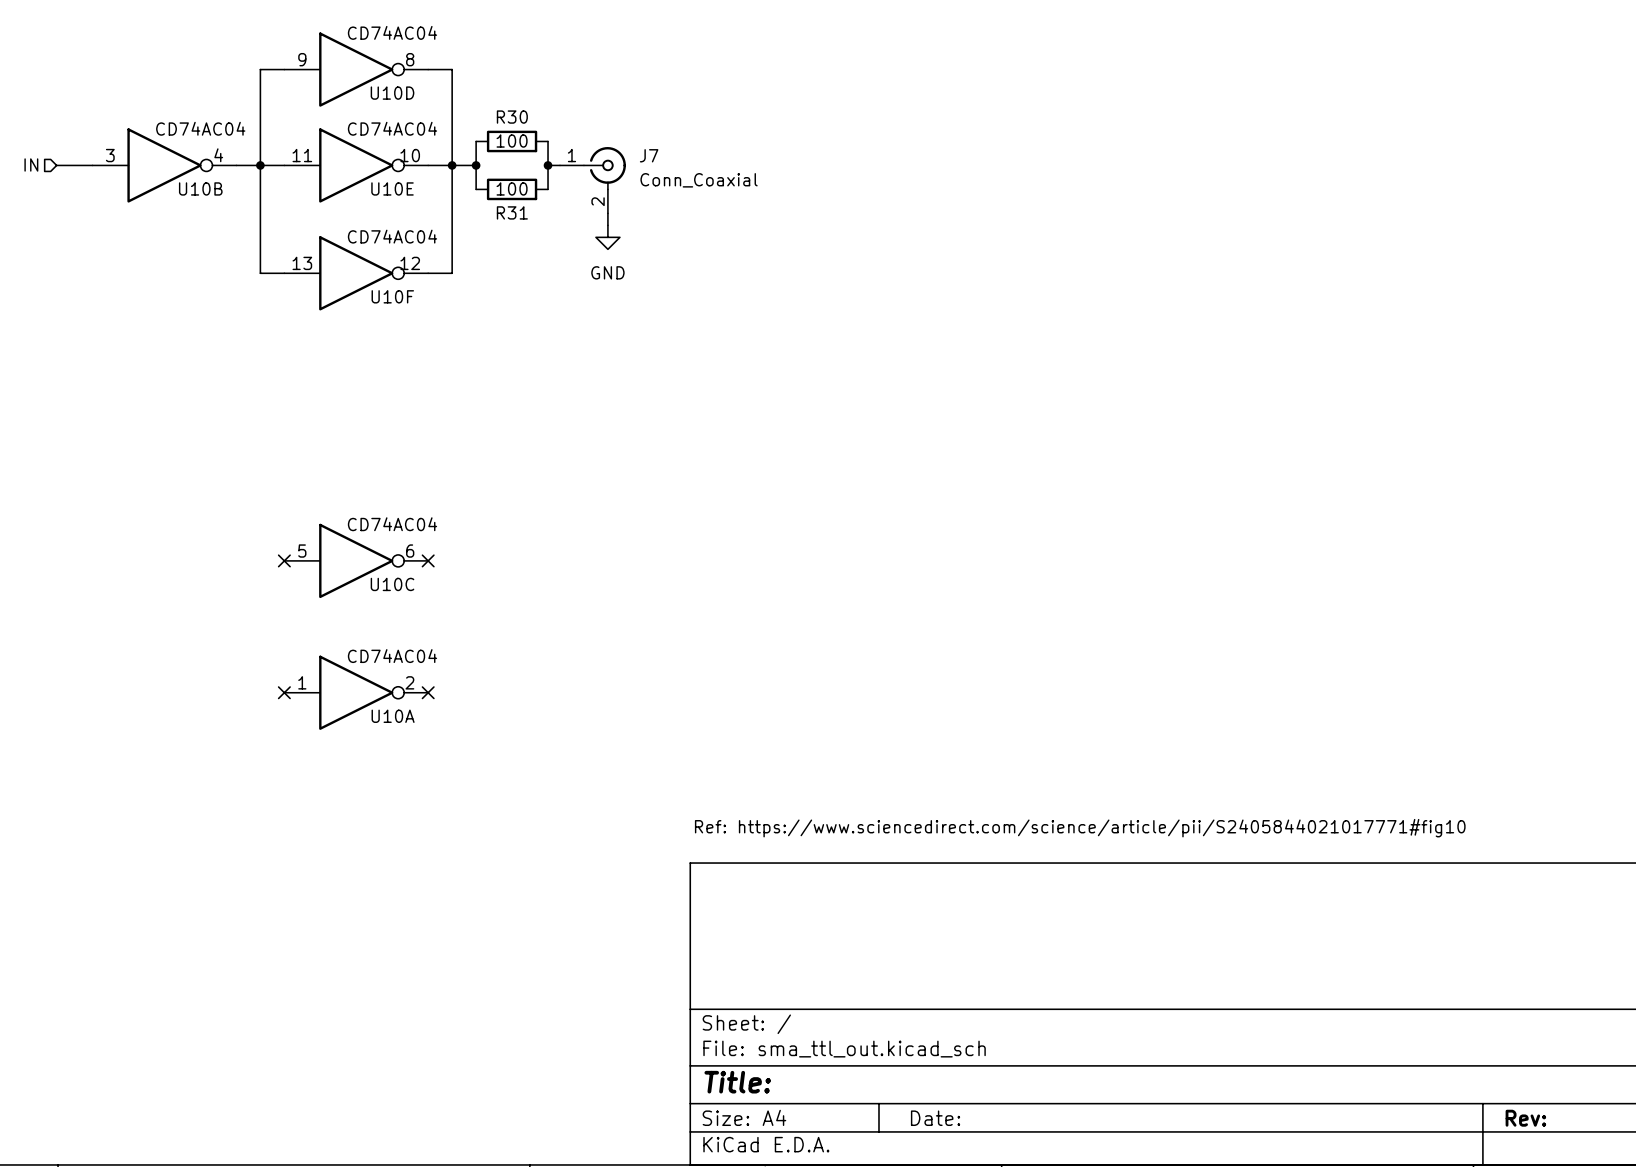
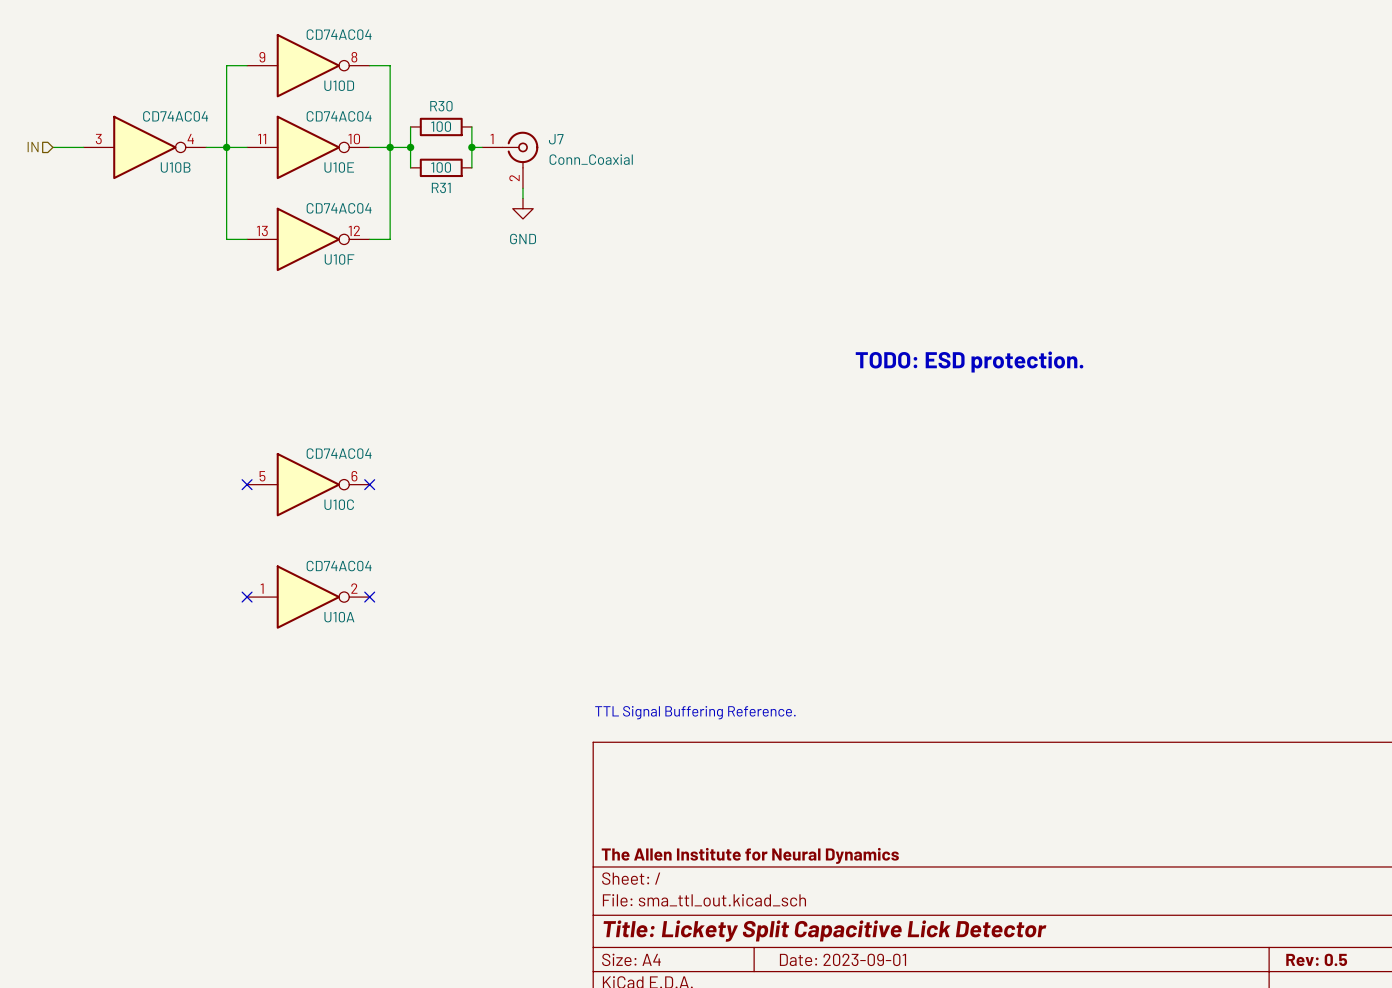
text: none -> TODO: ESD protection. (969, 362)
text: Ref: https://www.sciencedirect.com/science/article/pii/S2405844021017771#fig10 (1080, 828) -> TTL Signal Buffering Reference. (695, 712)
title block: none -> The Allen Institute for Neural Dynamics (750, 855)
title block: Title: (737, 1082) -> Title: Lickety Split Capacitive Lick Detector (825, 931)
title block: Date: (935, 1118) -> Date: 2023-09-01 (842, 959)
title block: Rev: (1525, 1118) -> Rev: 0.5 (1316, 959)

